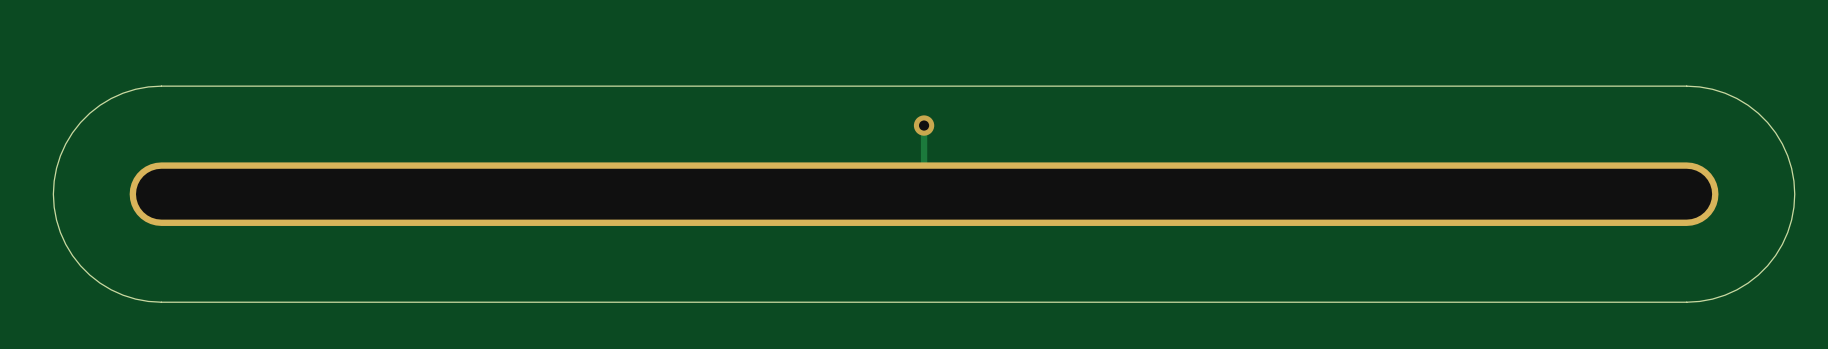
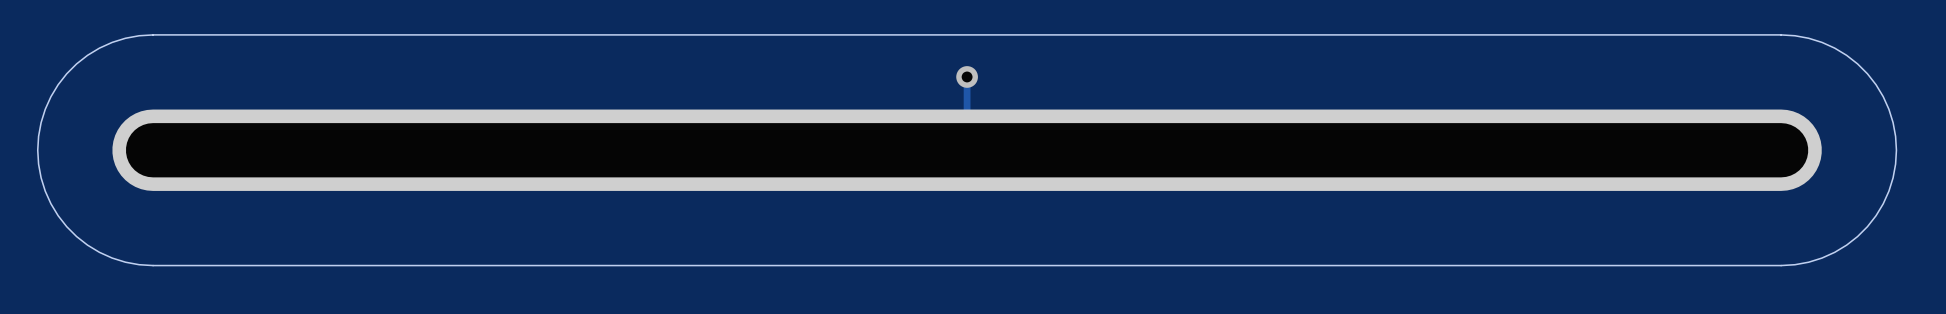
part footprint: [129, 162, 1719, 226] -> [112, 109, 1822, 191]

